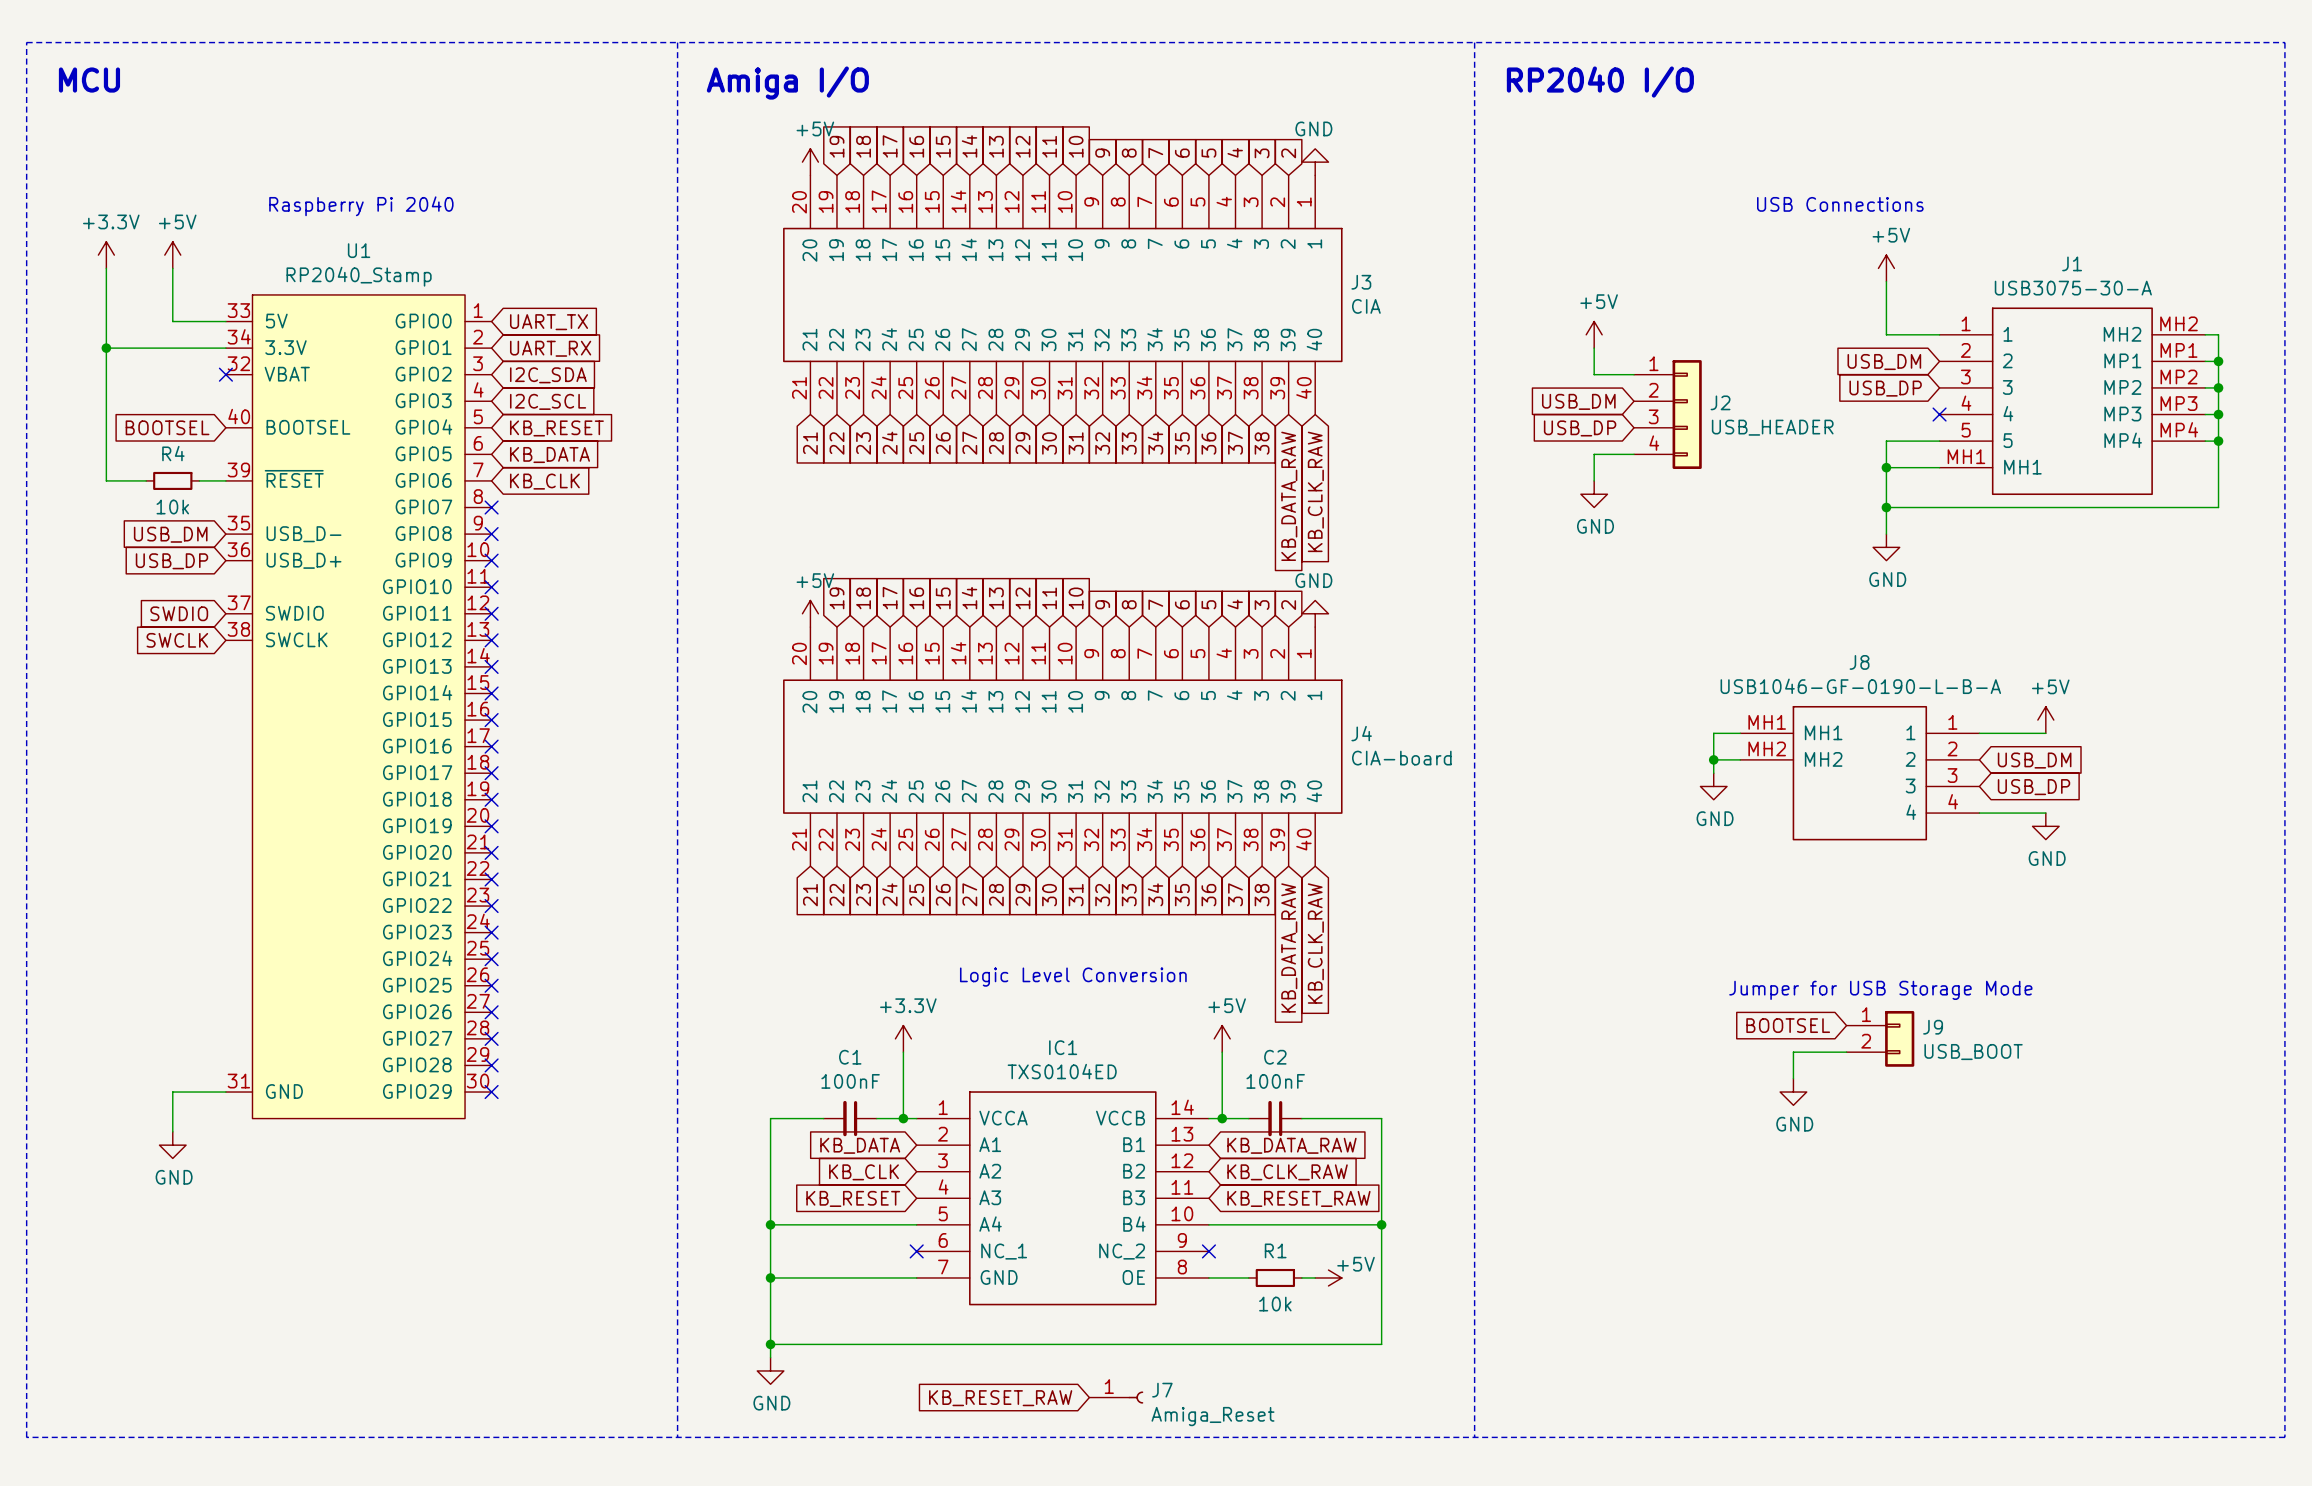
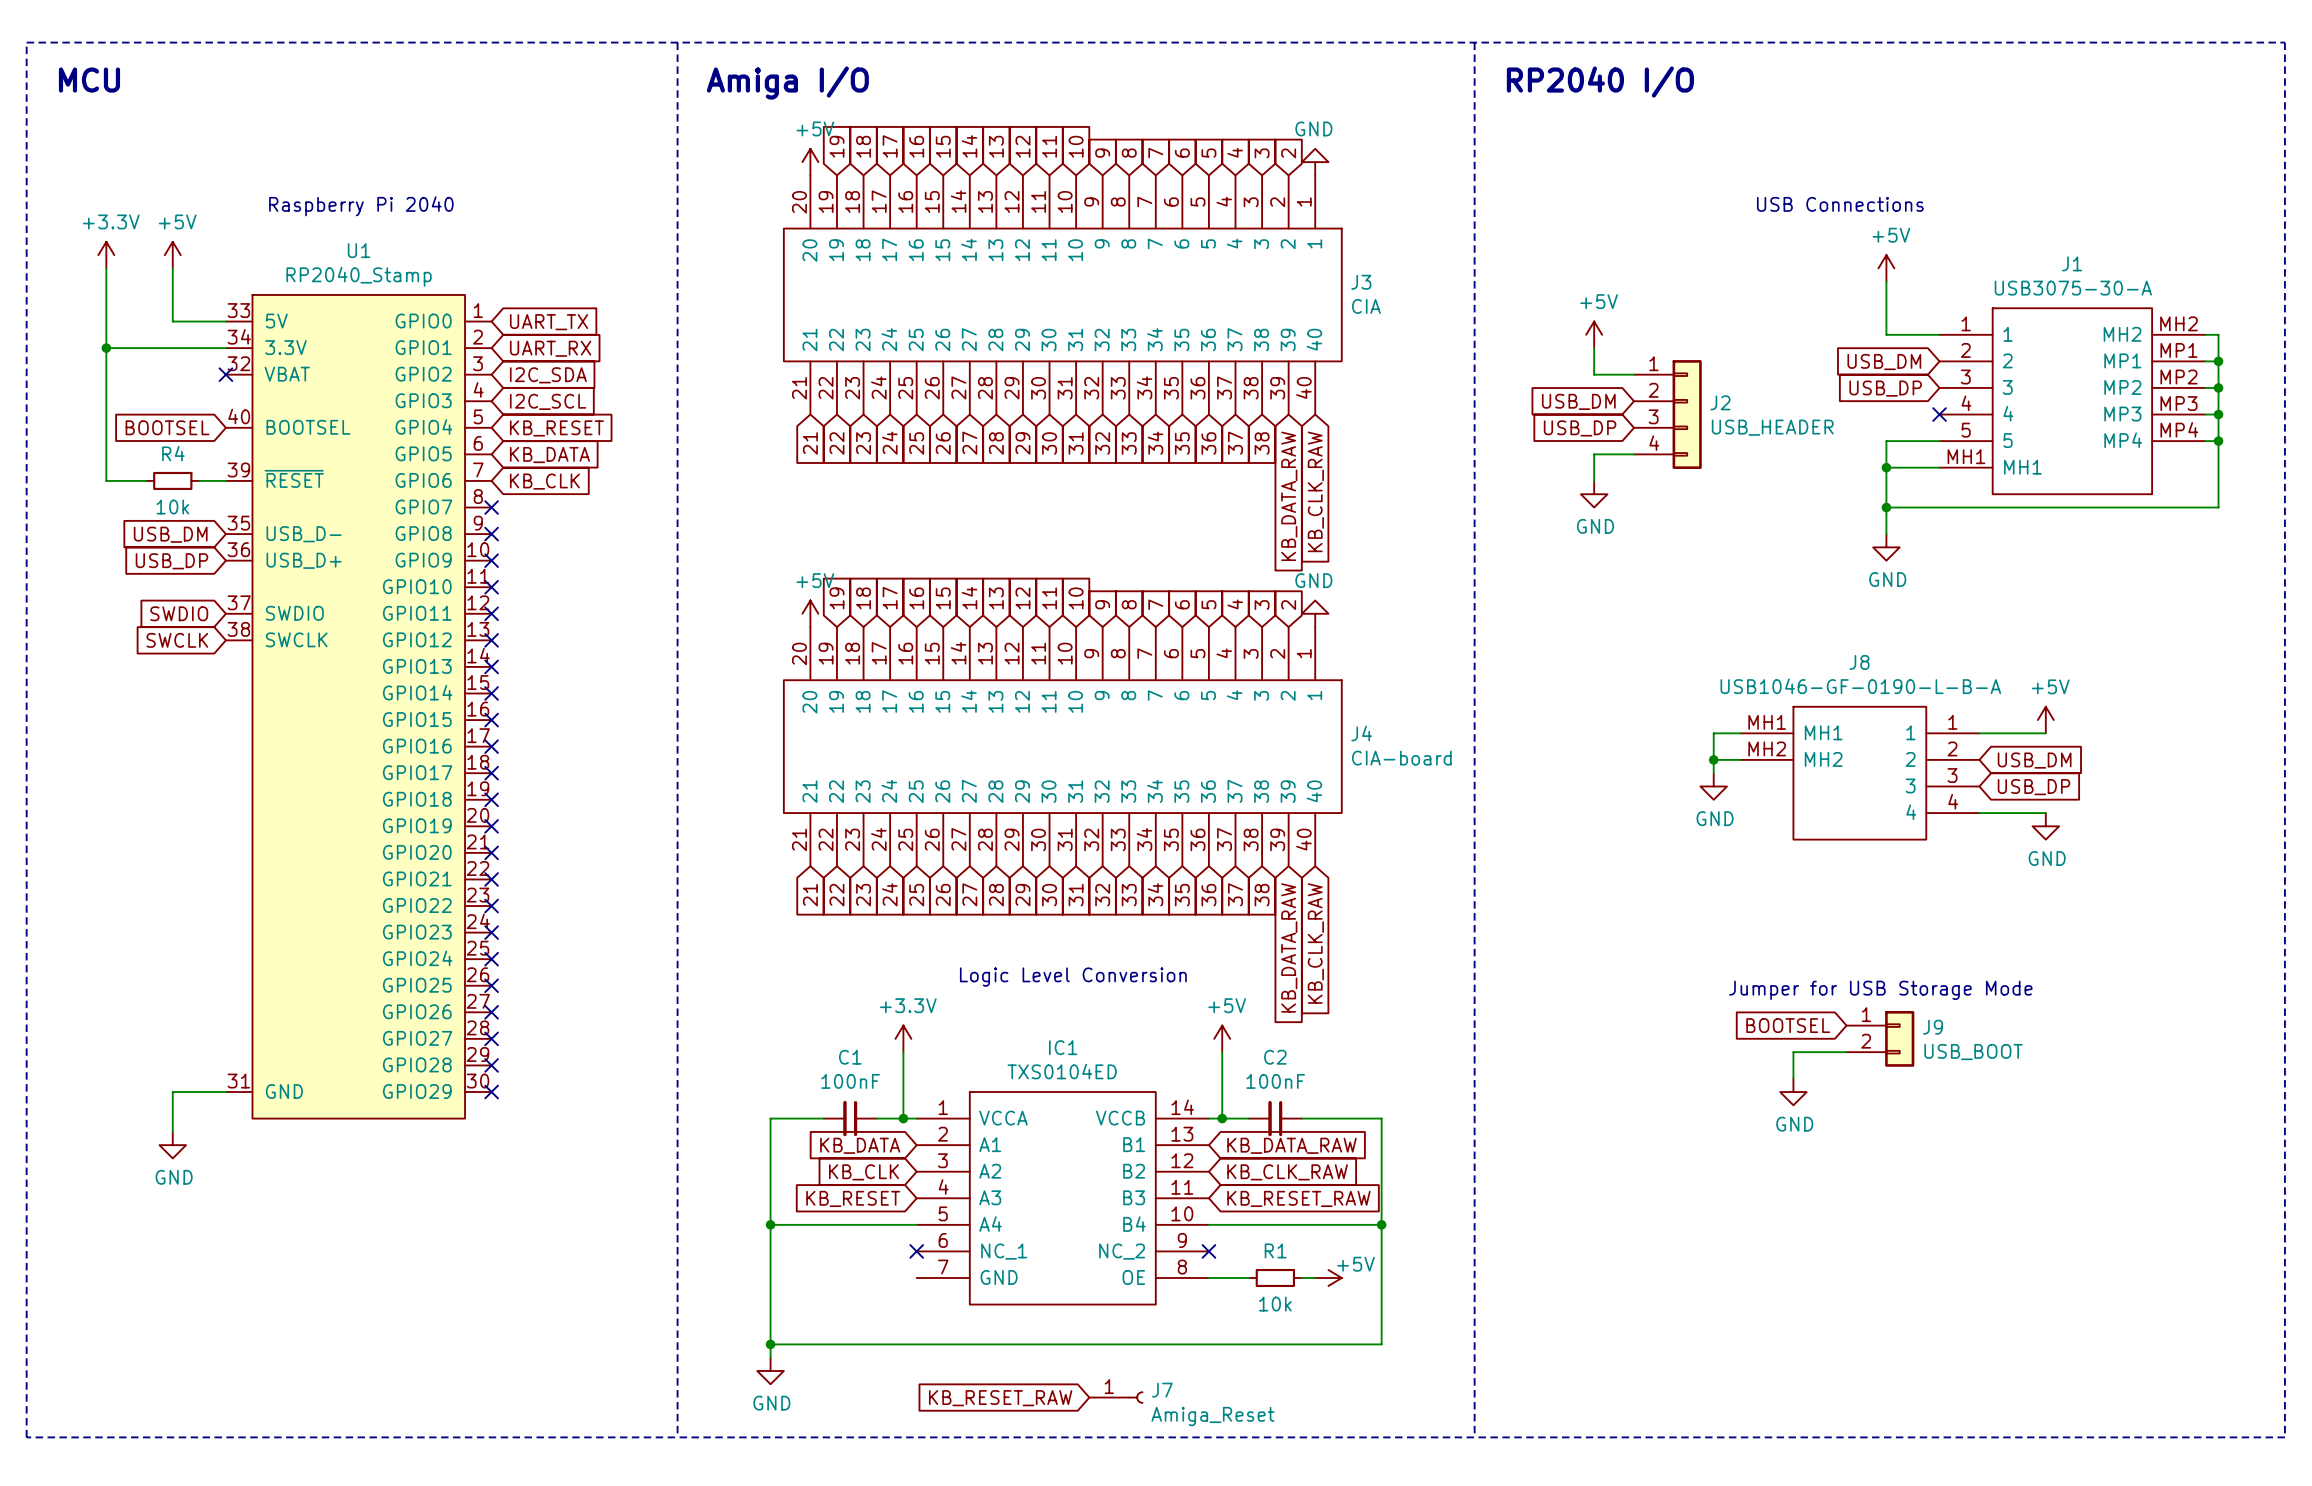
wire: (770, 1277) (916, 1277) -> none
junction: (770, 1277) -> none

